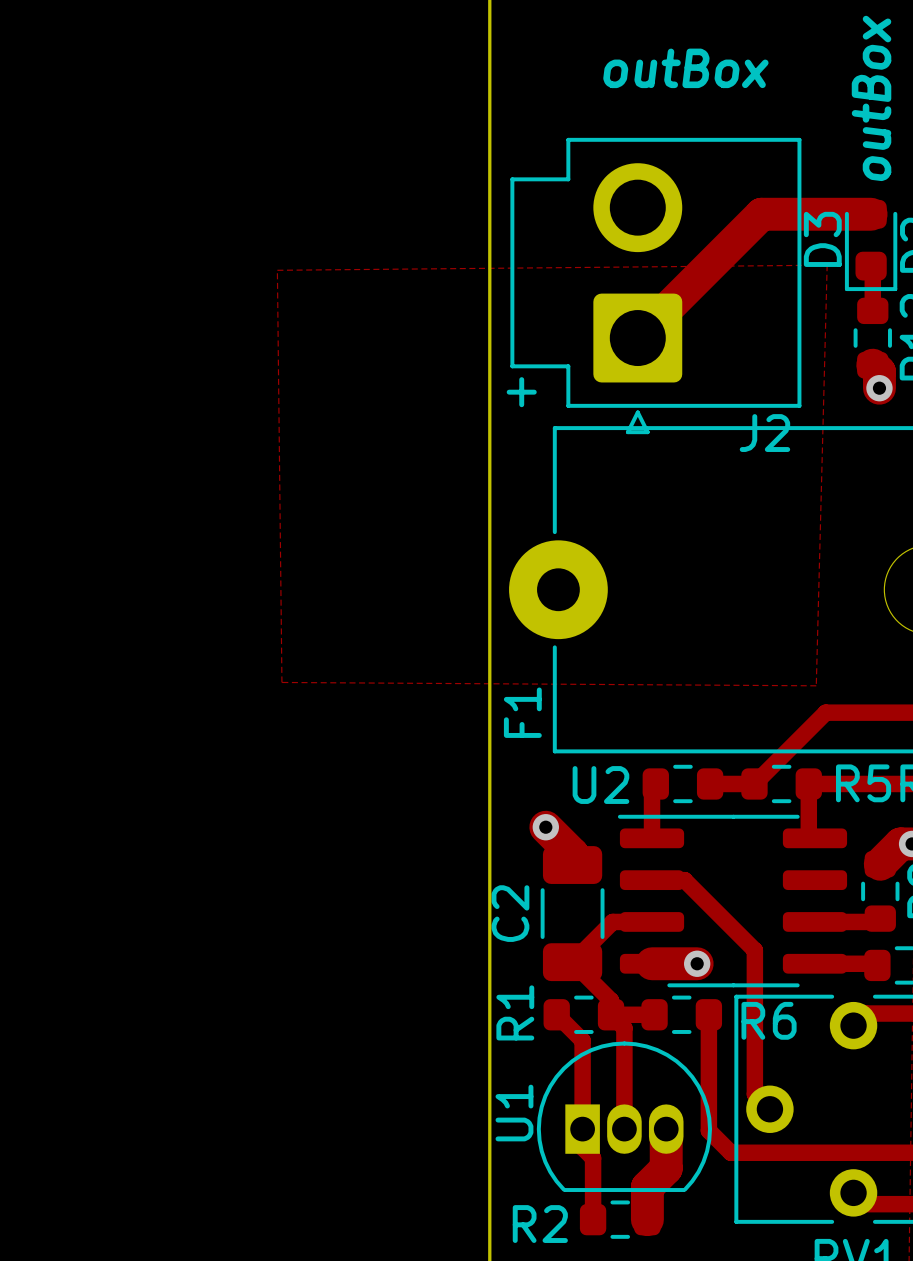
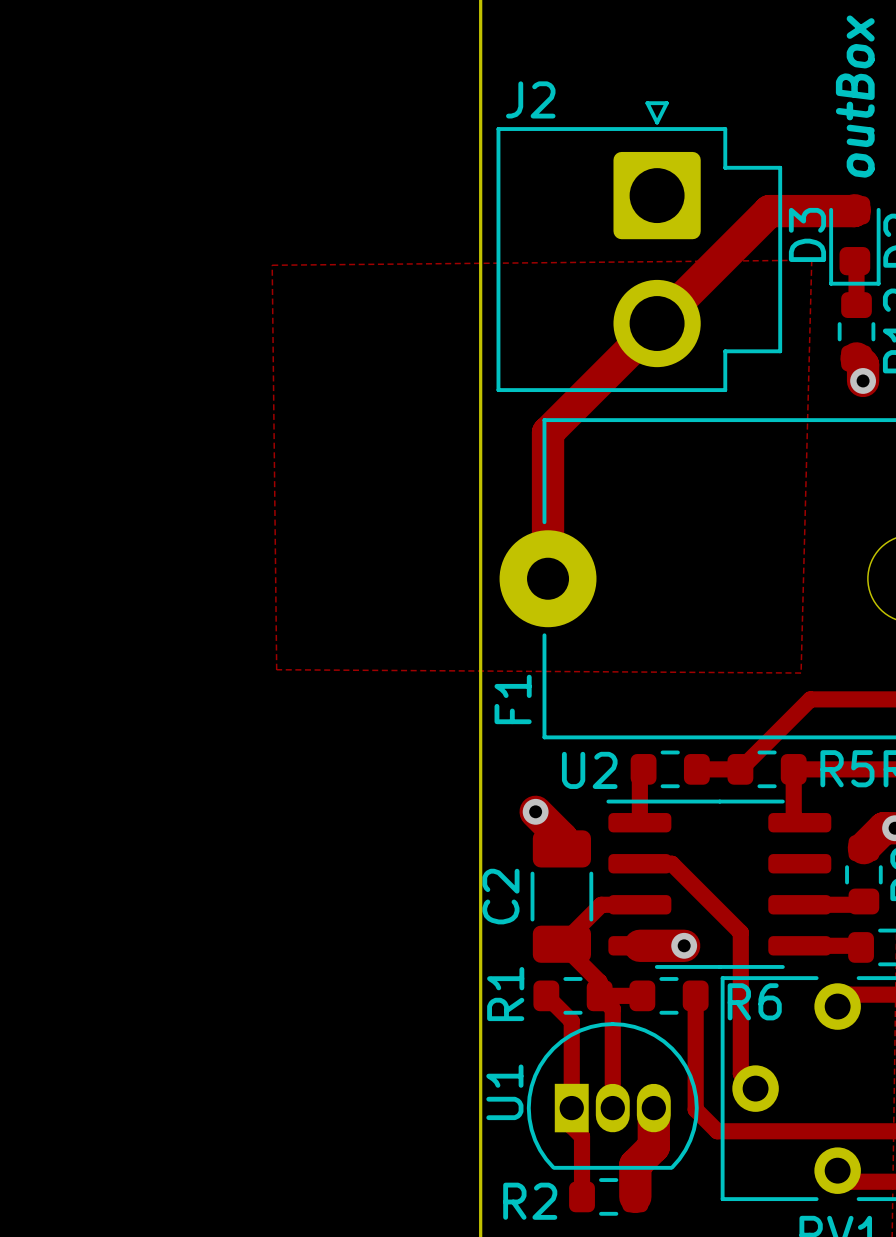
text: outBox (685, 68) -> none
top track: (871, 214) (761, 214) (637, 338) -> (854, 210) (769, 211) (548, 432) (548, 578)
J2 rotation: 0° (655, 286) -> 180° (639, 246)
text: + (521, 392) -> none

